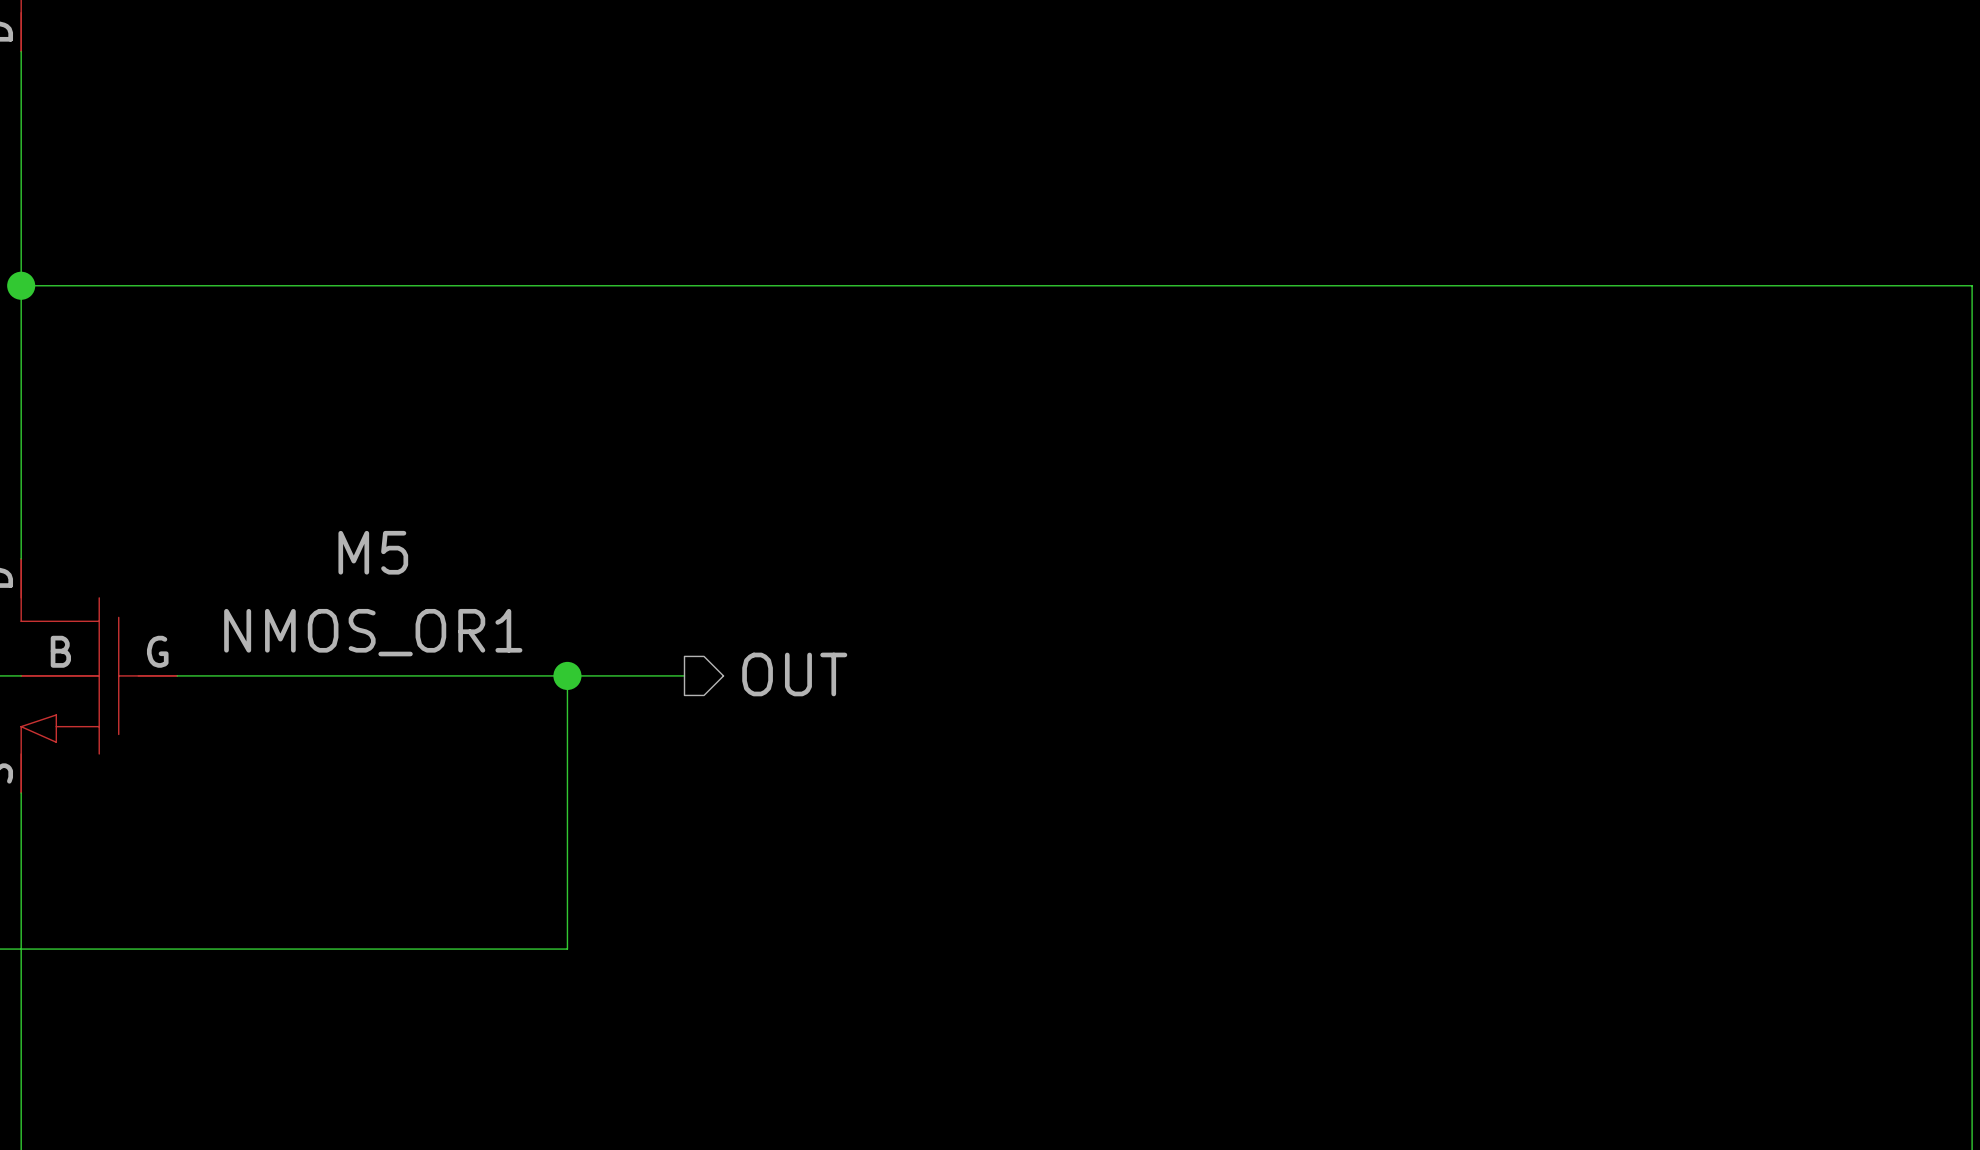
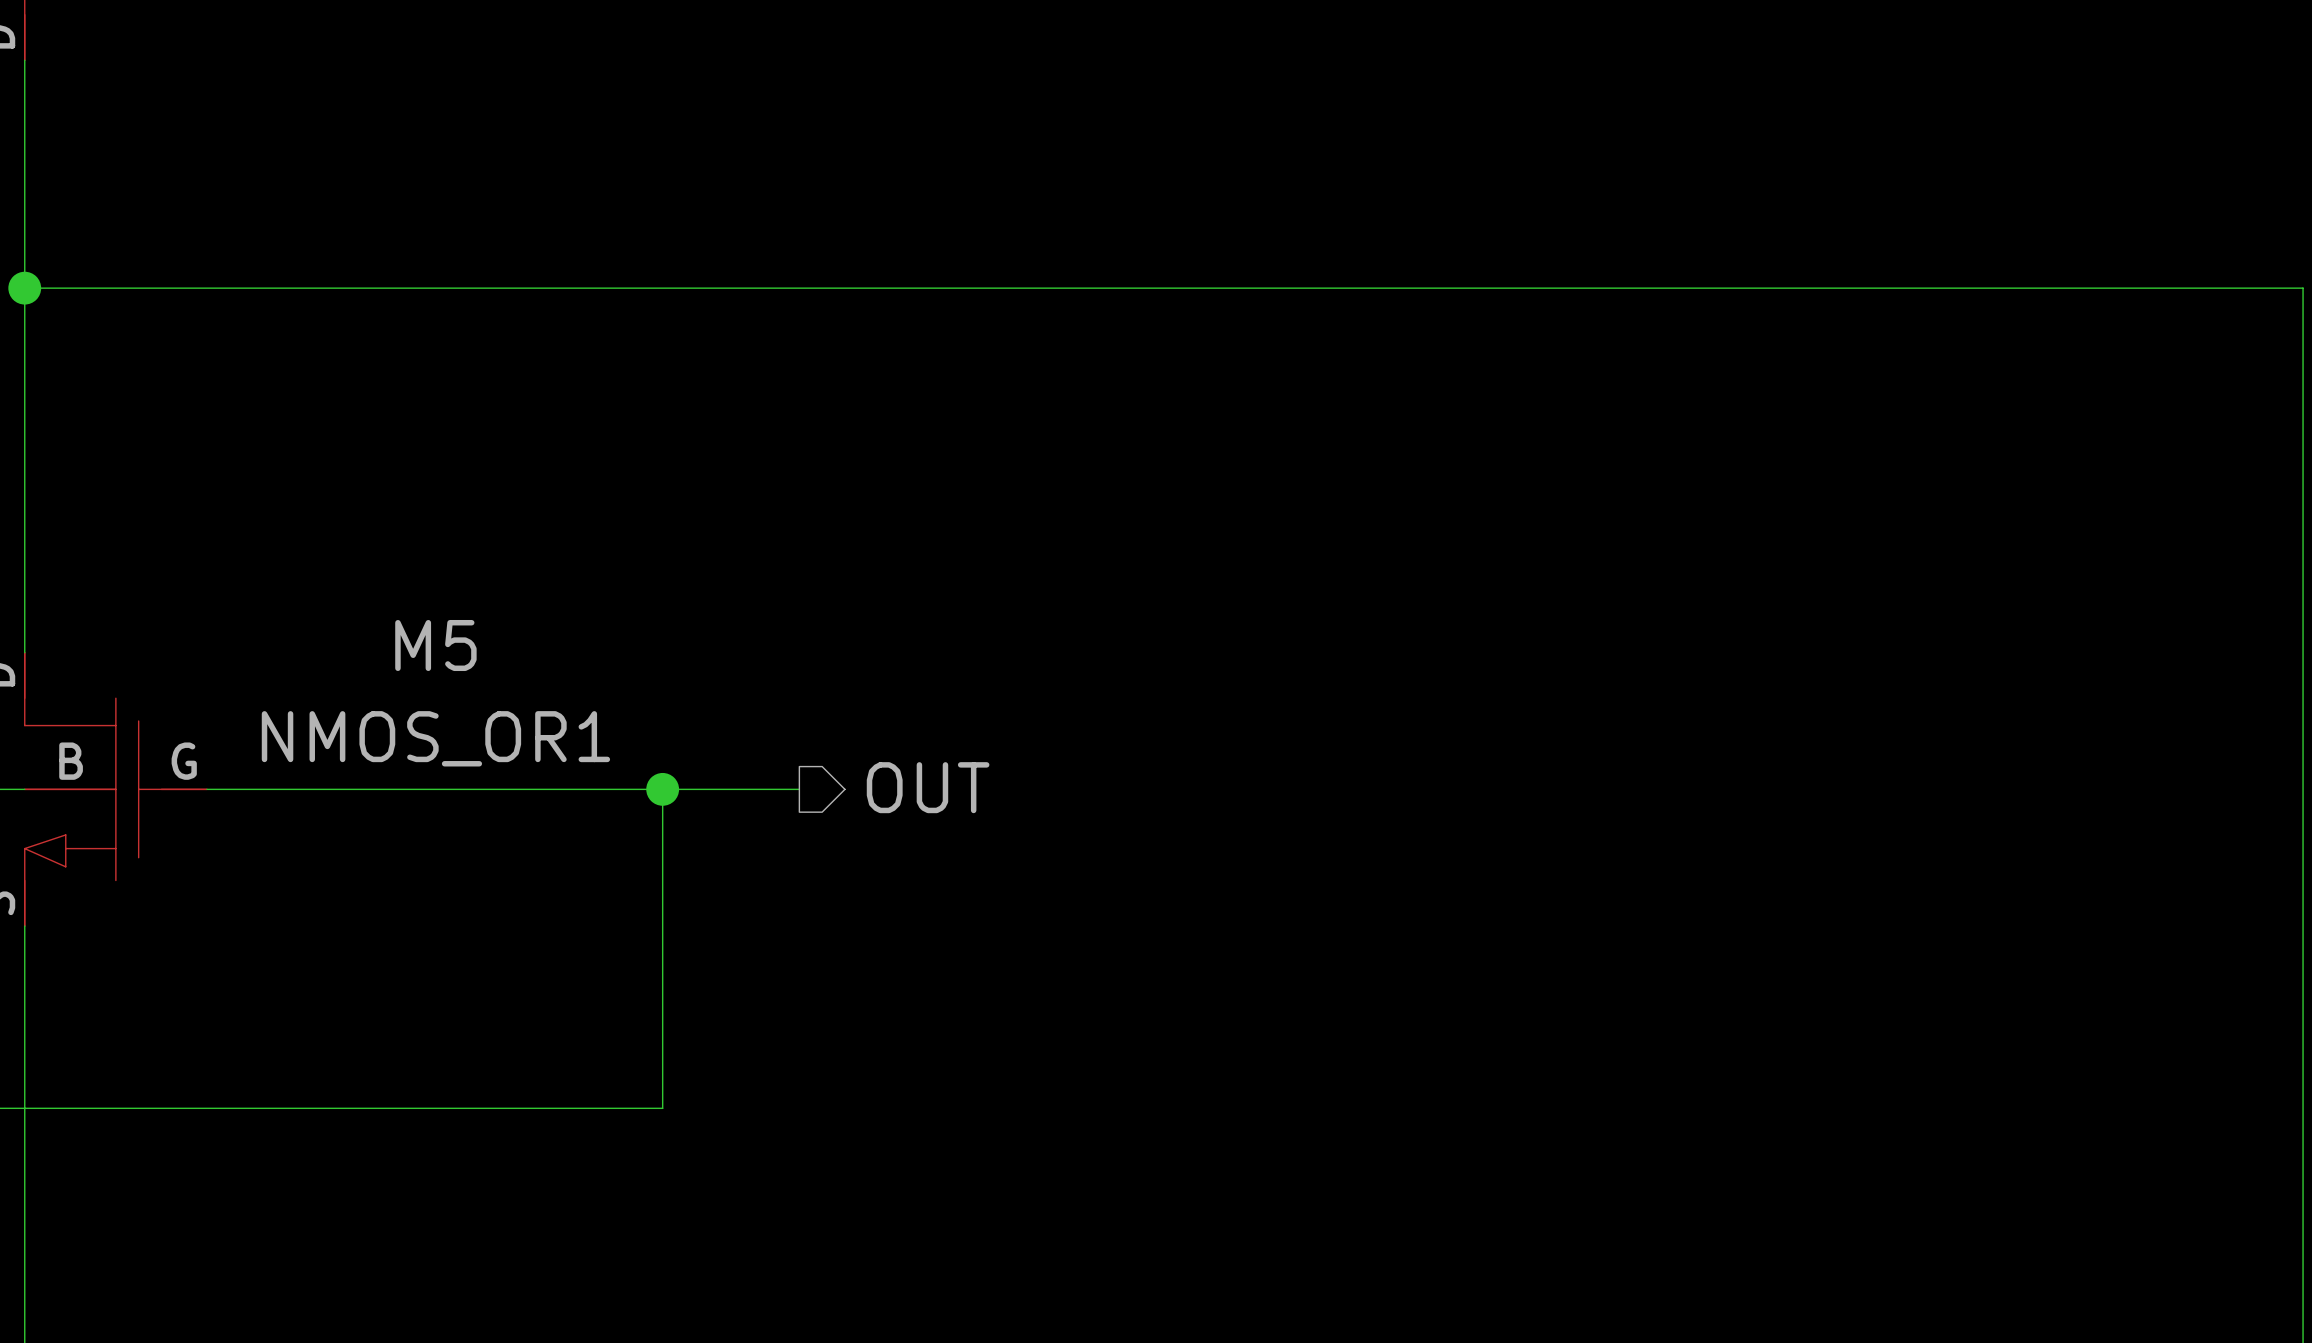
wire: (21, 285) (1972, 285) -> (24, 288) (2303, 288) (2303, 333)
junction position: (21, 285) -> (24, 288)

